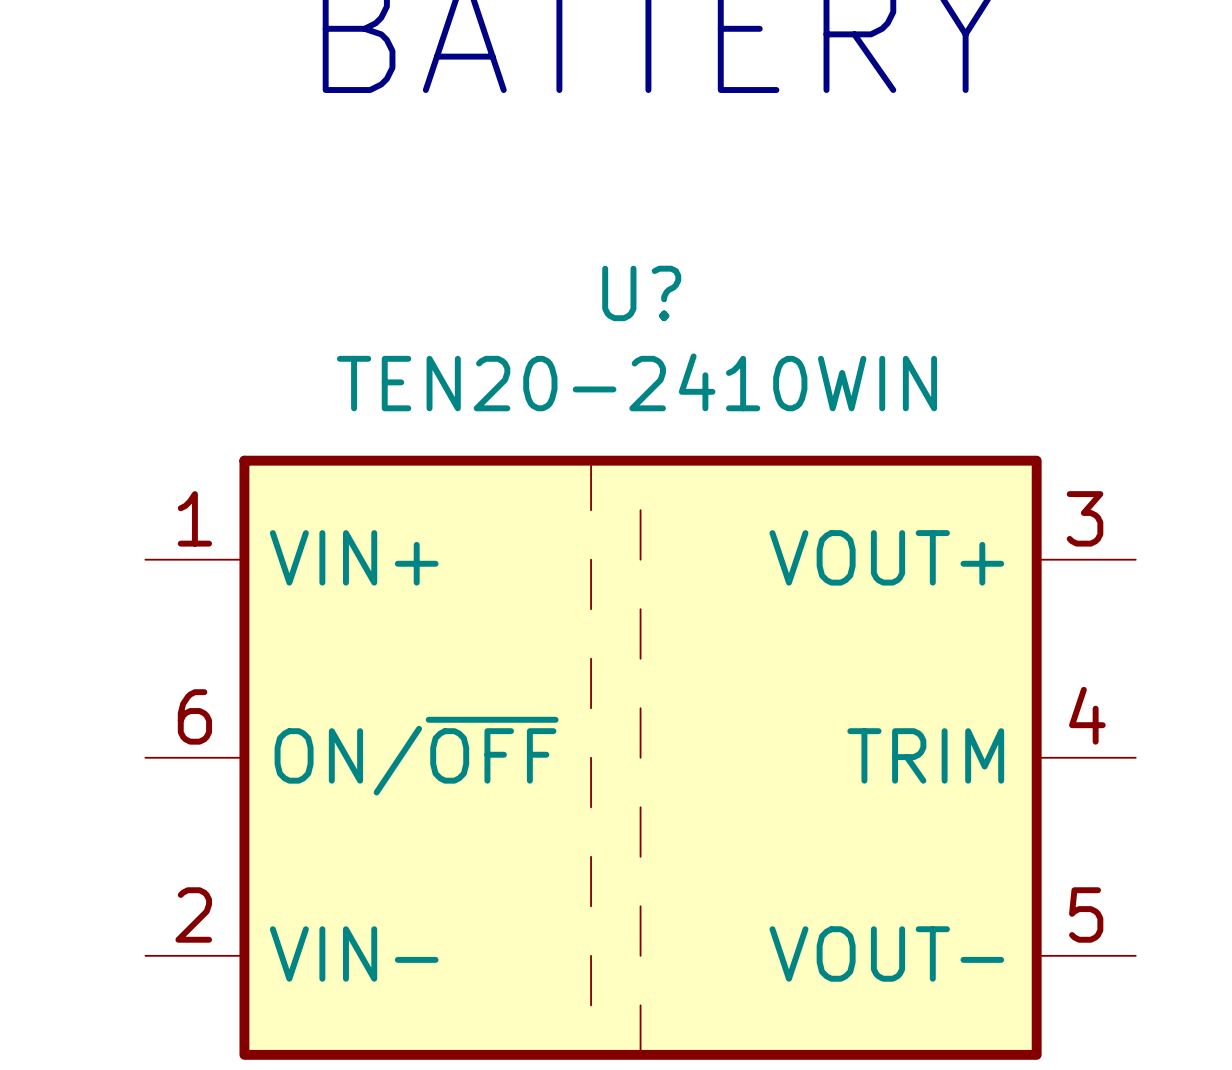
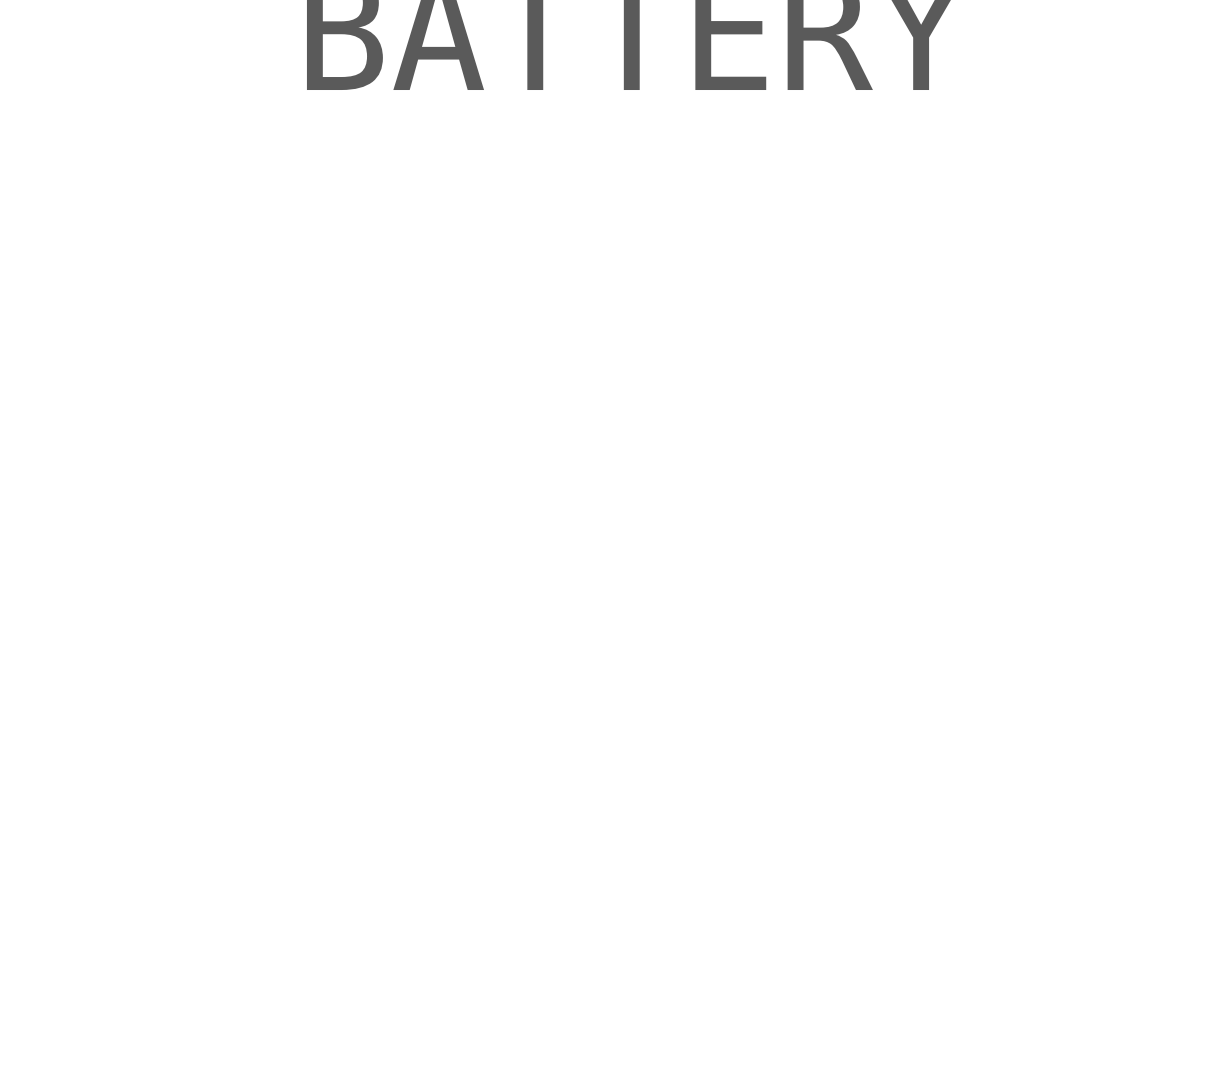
U?: TEN20-2410WIN (640, 757) -> none

